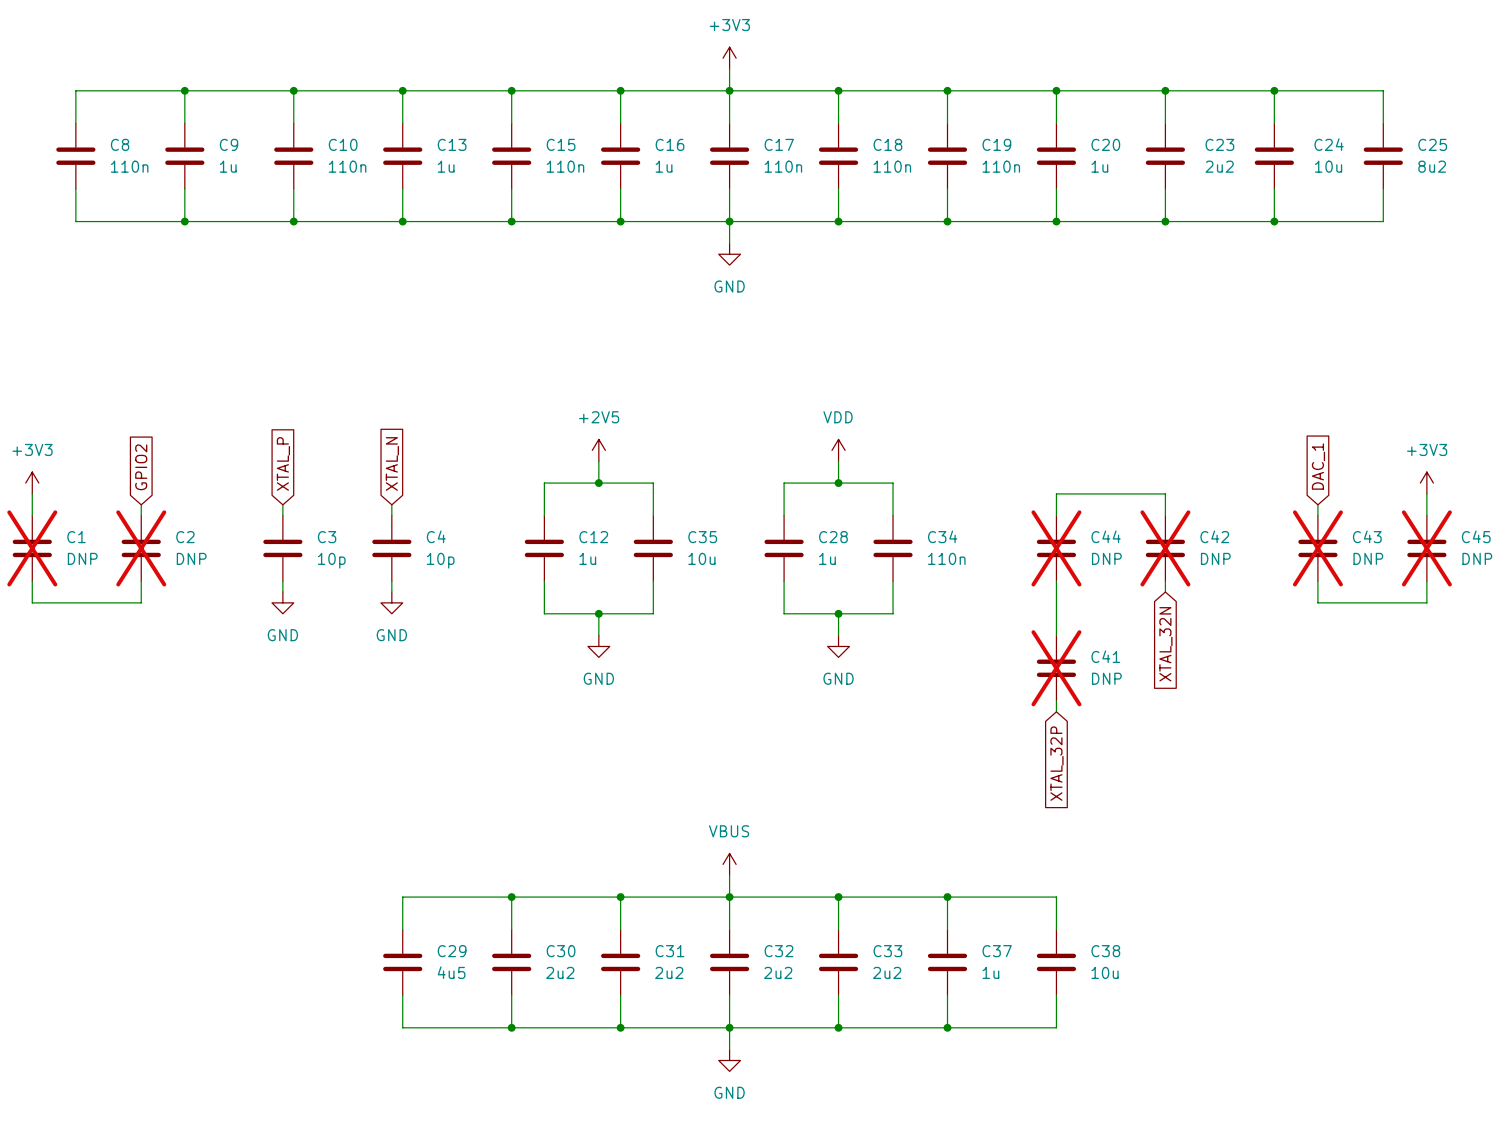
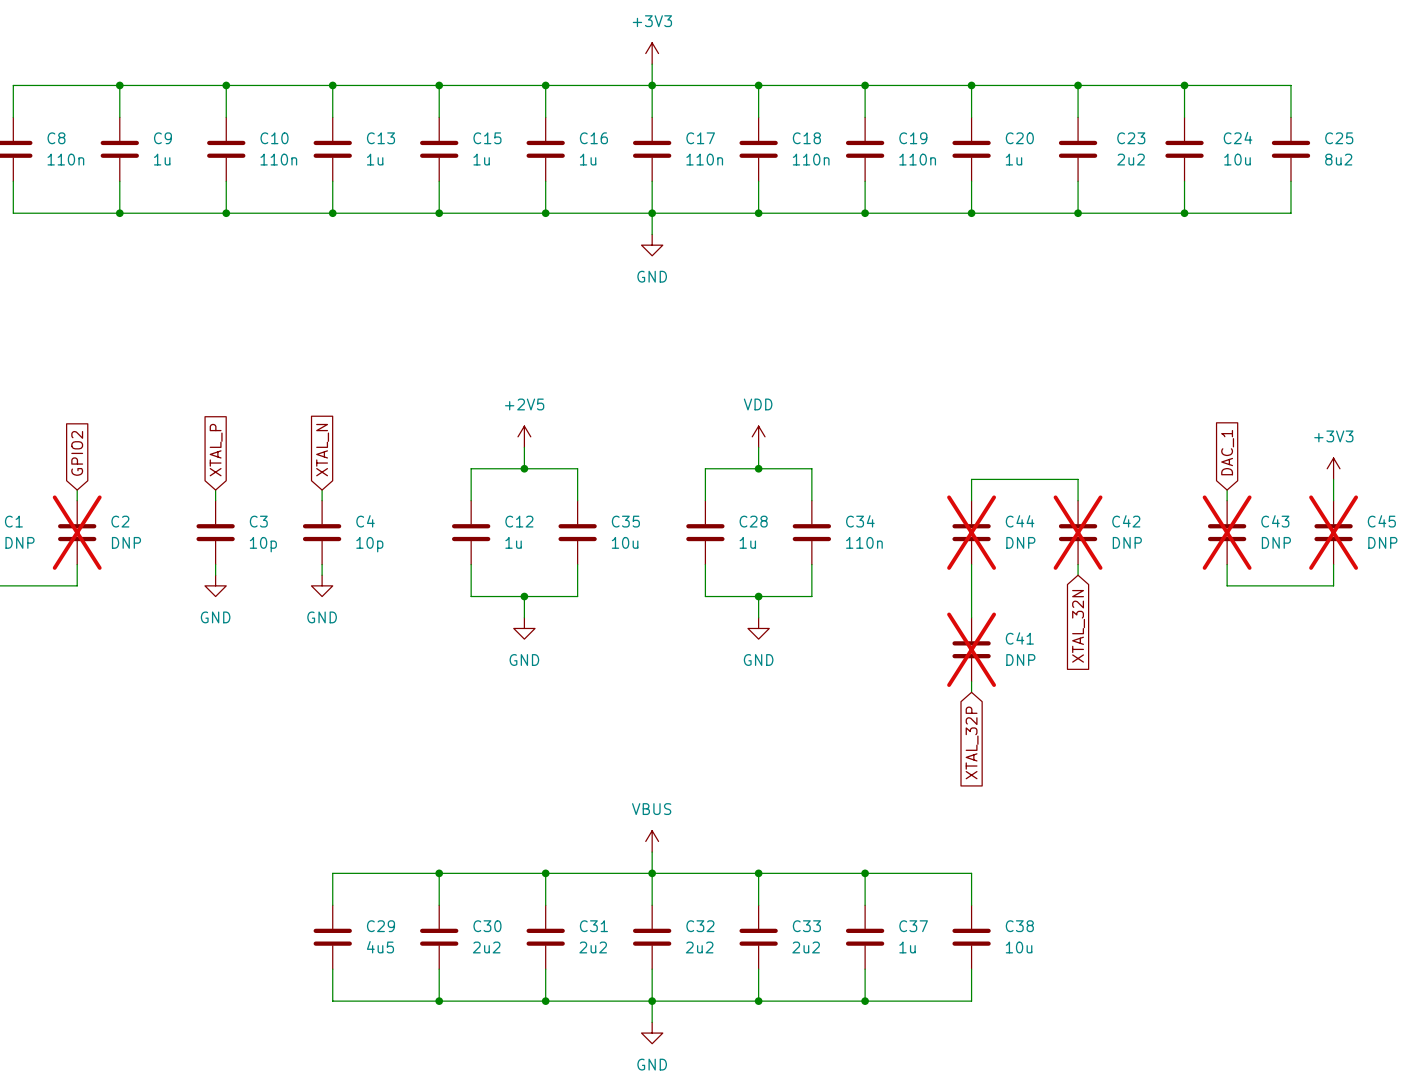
C15 value: 110n (565, 166) -> 1u (481, 159)

